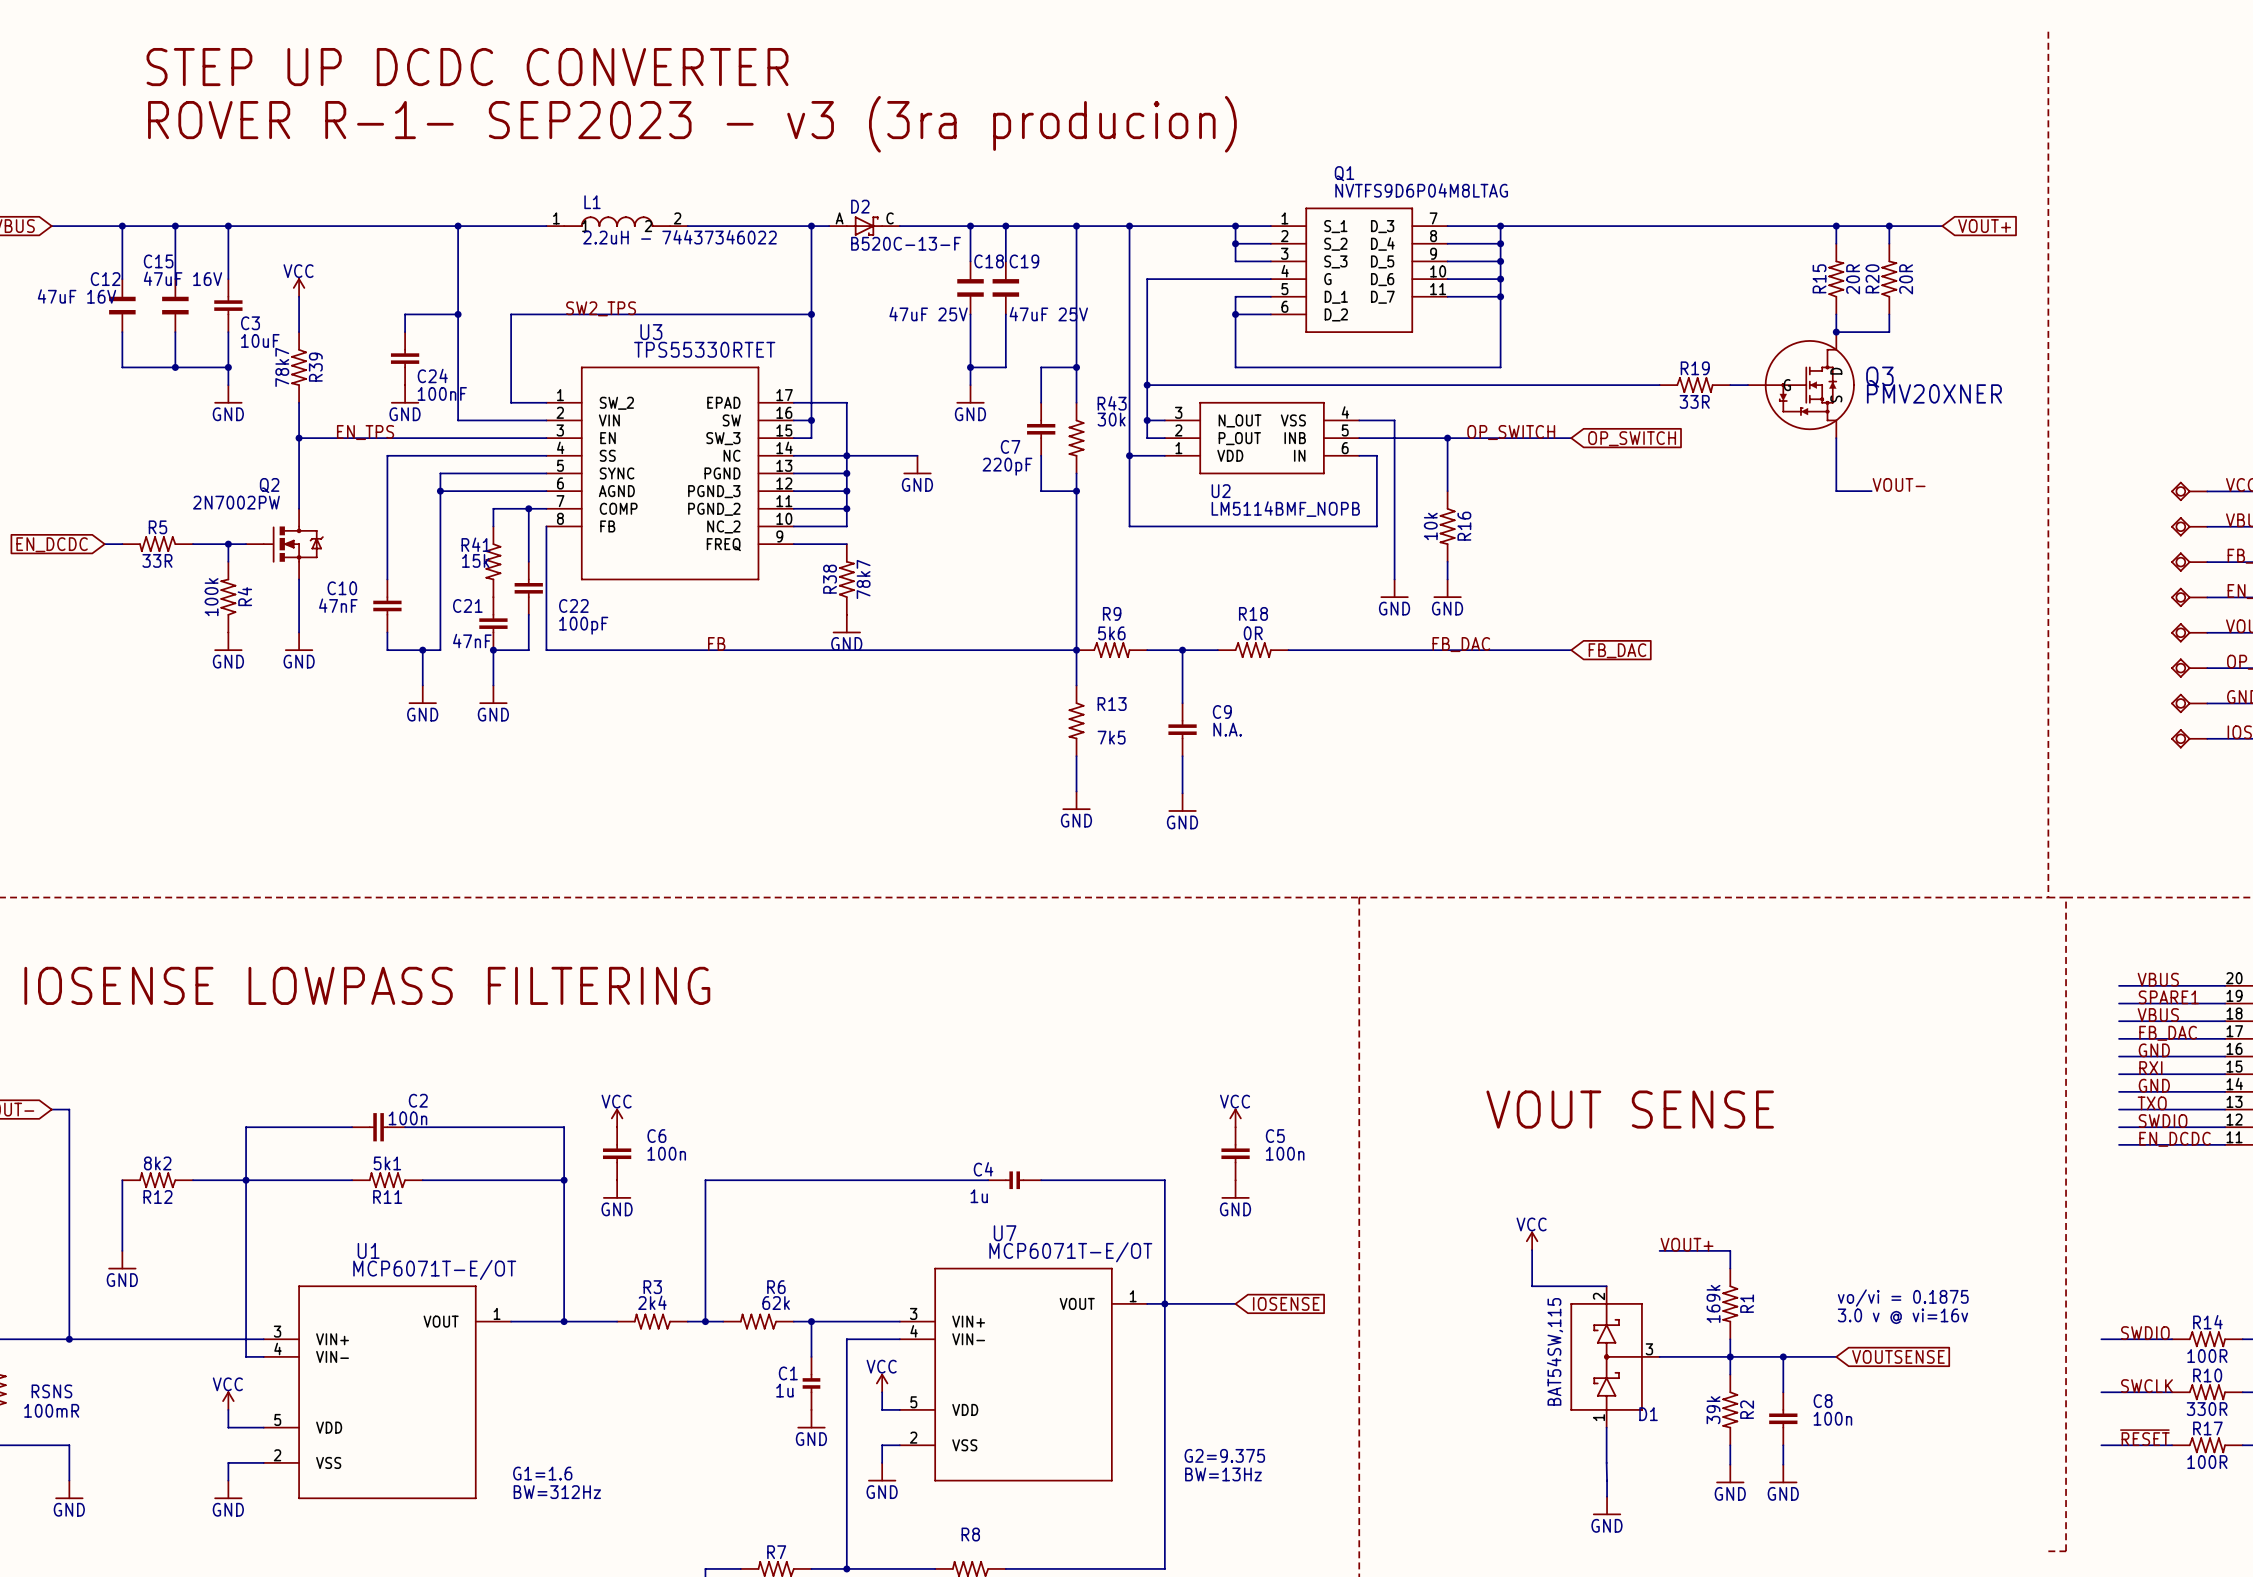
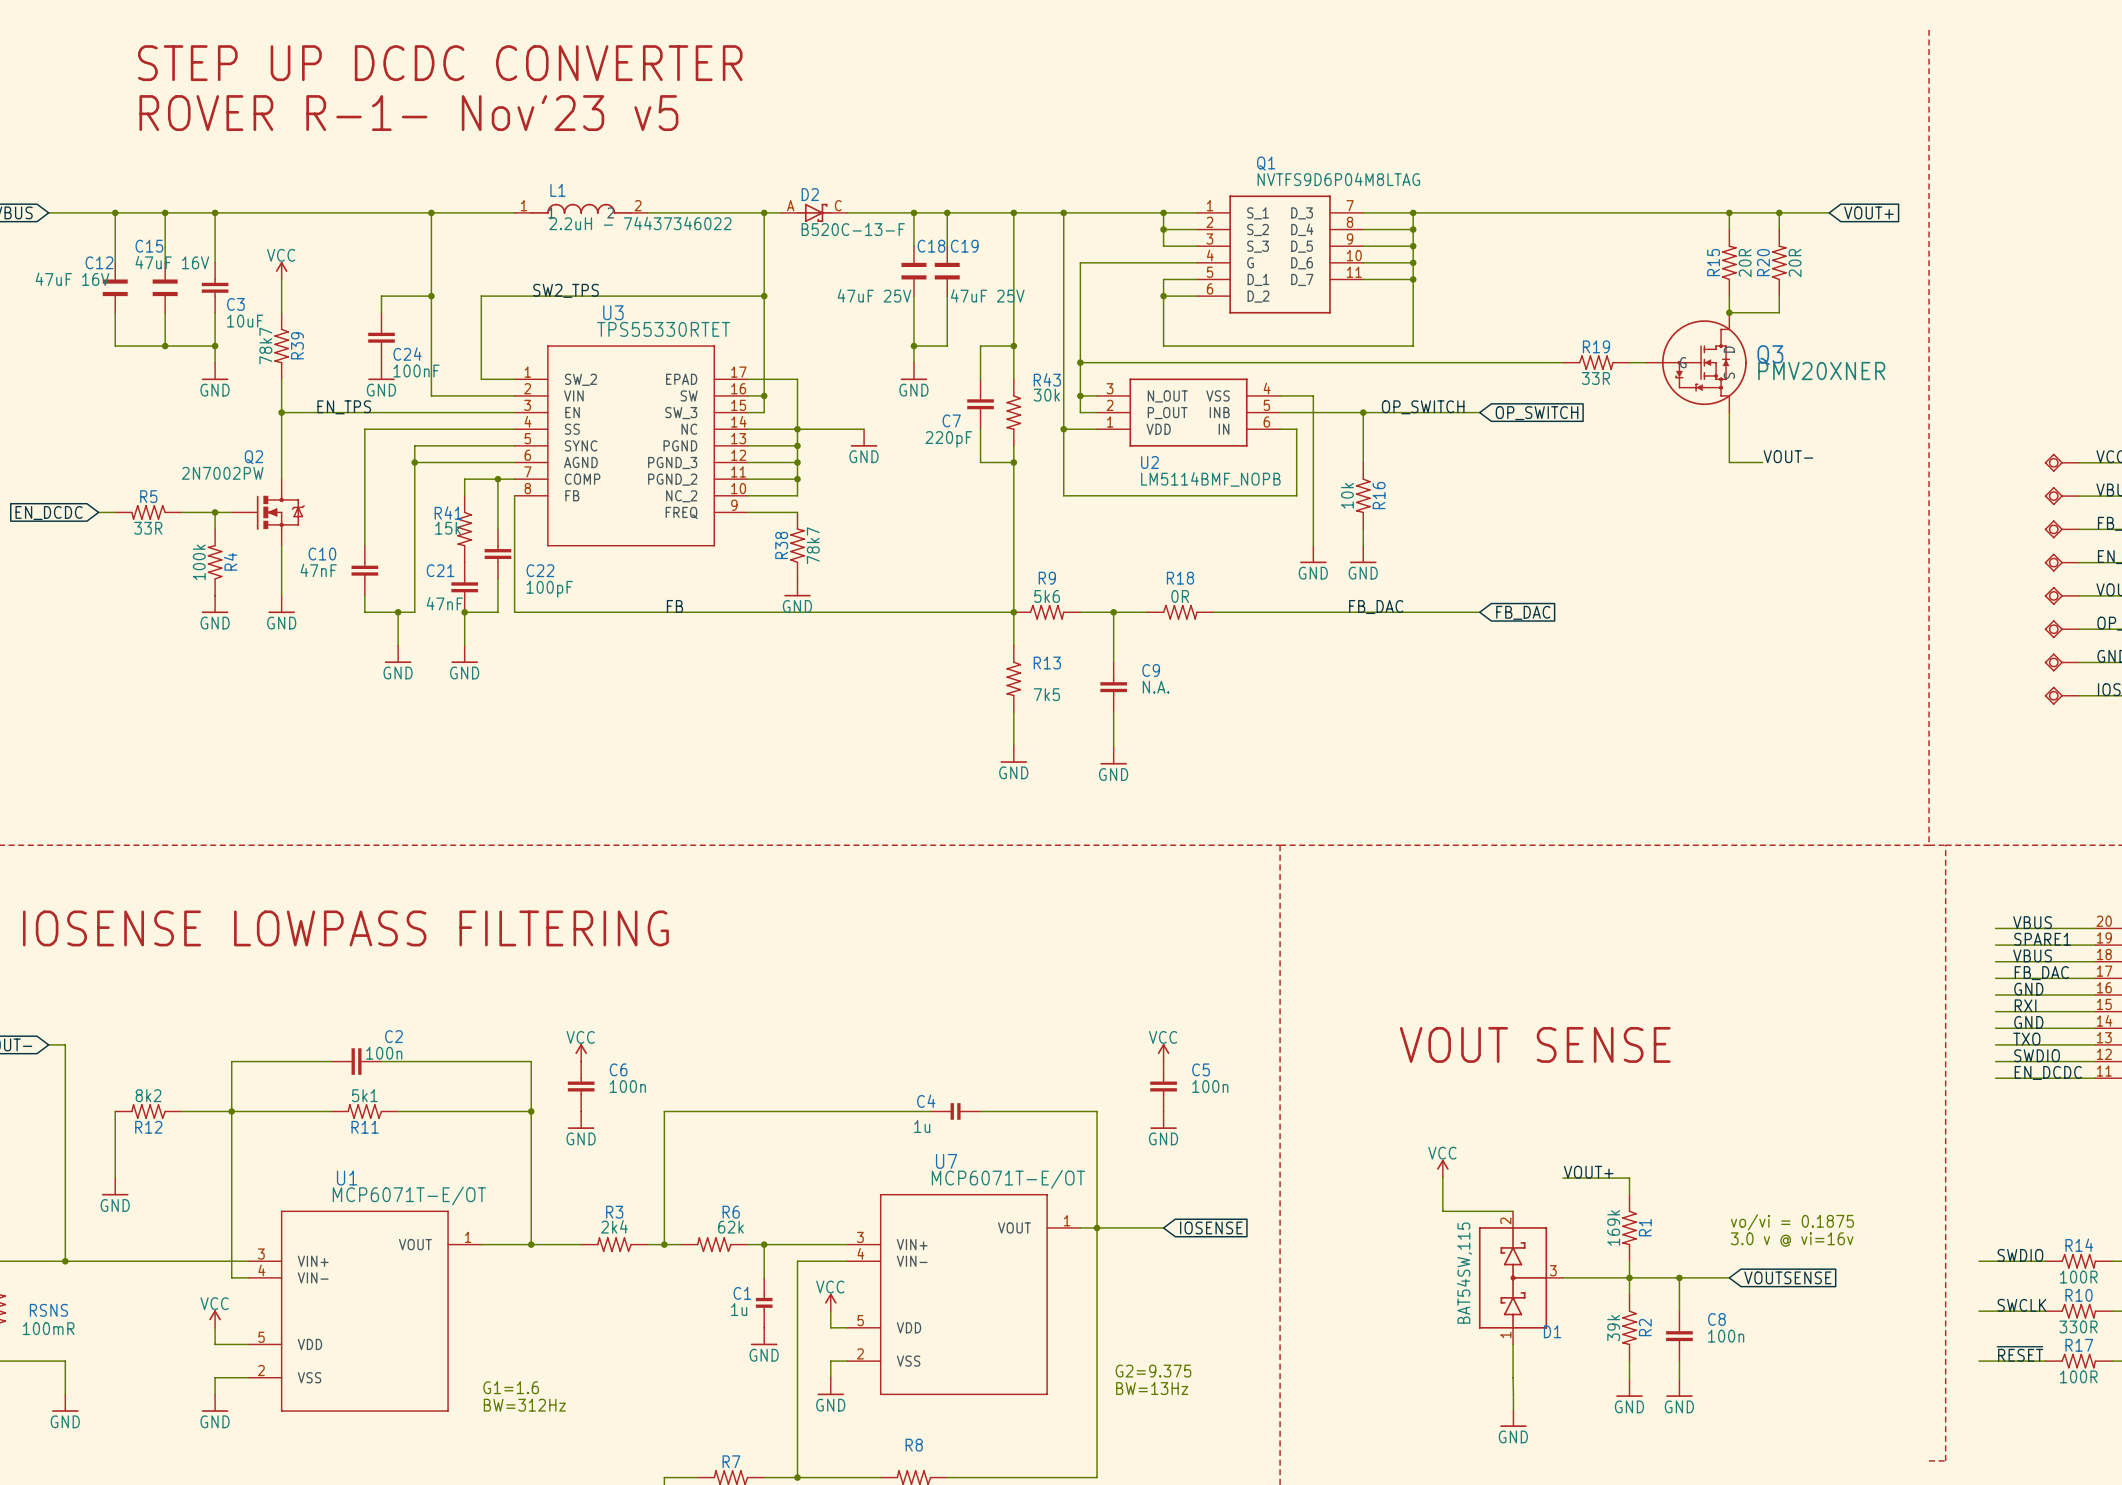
text: ROVER R-1- SEP2023 - v3 (3ra producion) (692, 124) -> ROVER R-1- Nov'23 v5 (408, 113)

